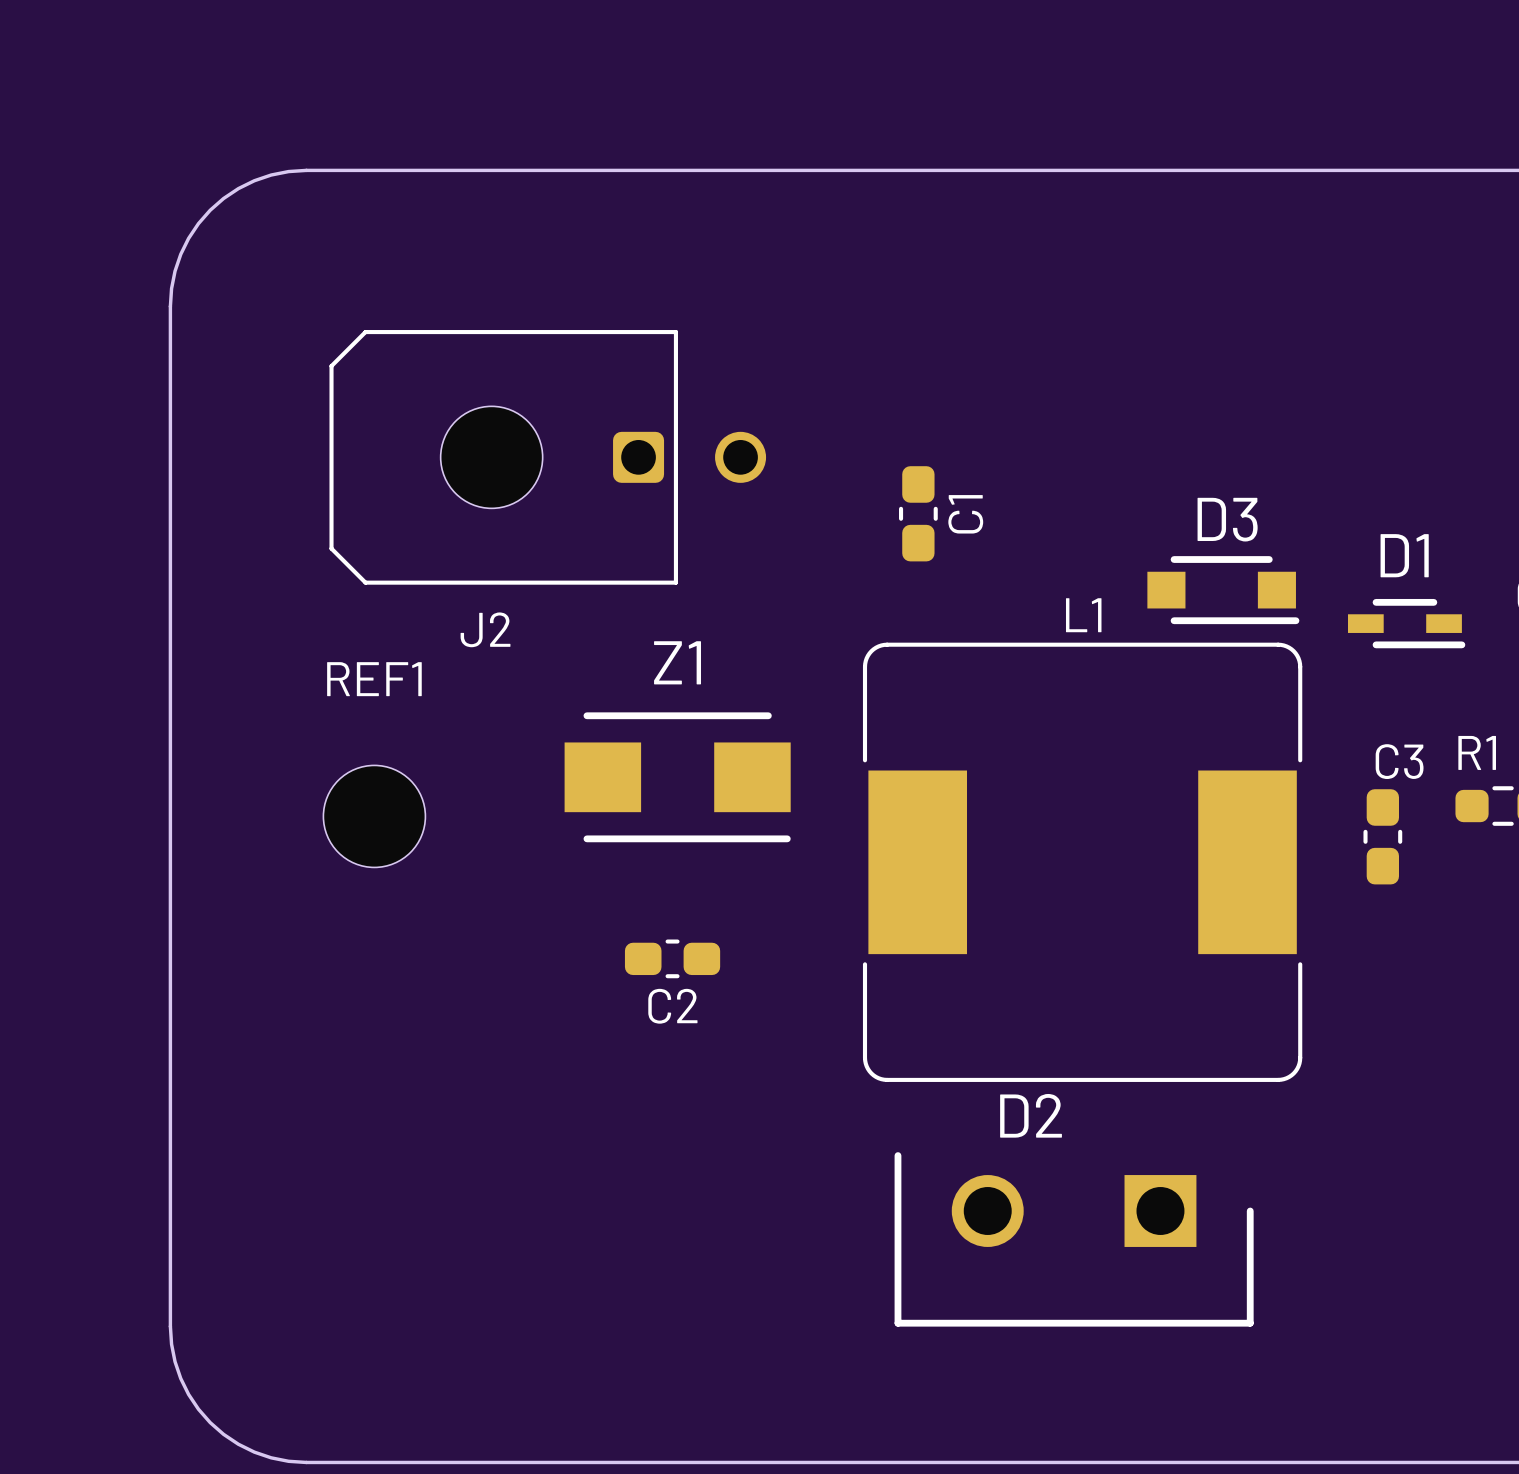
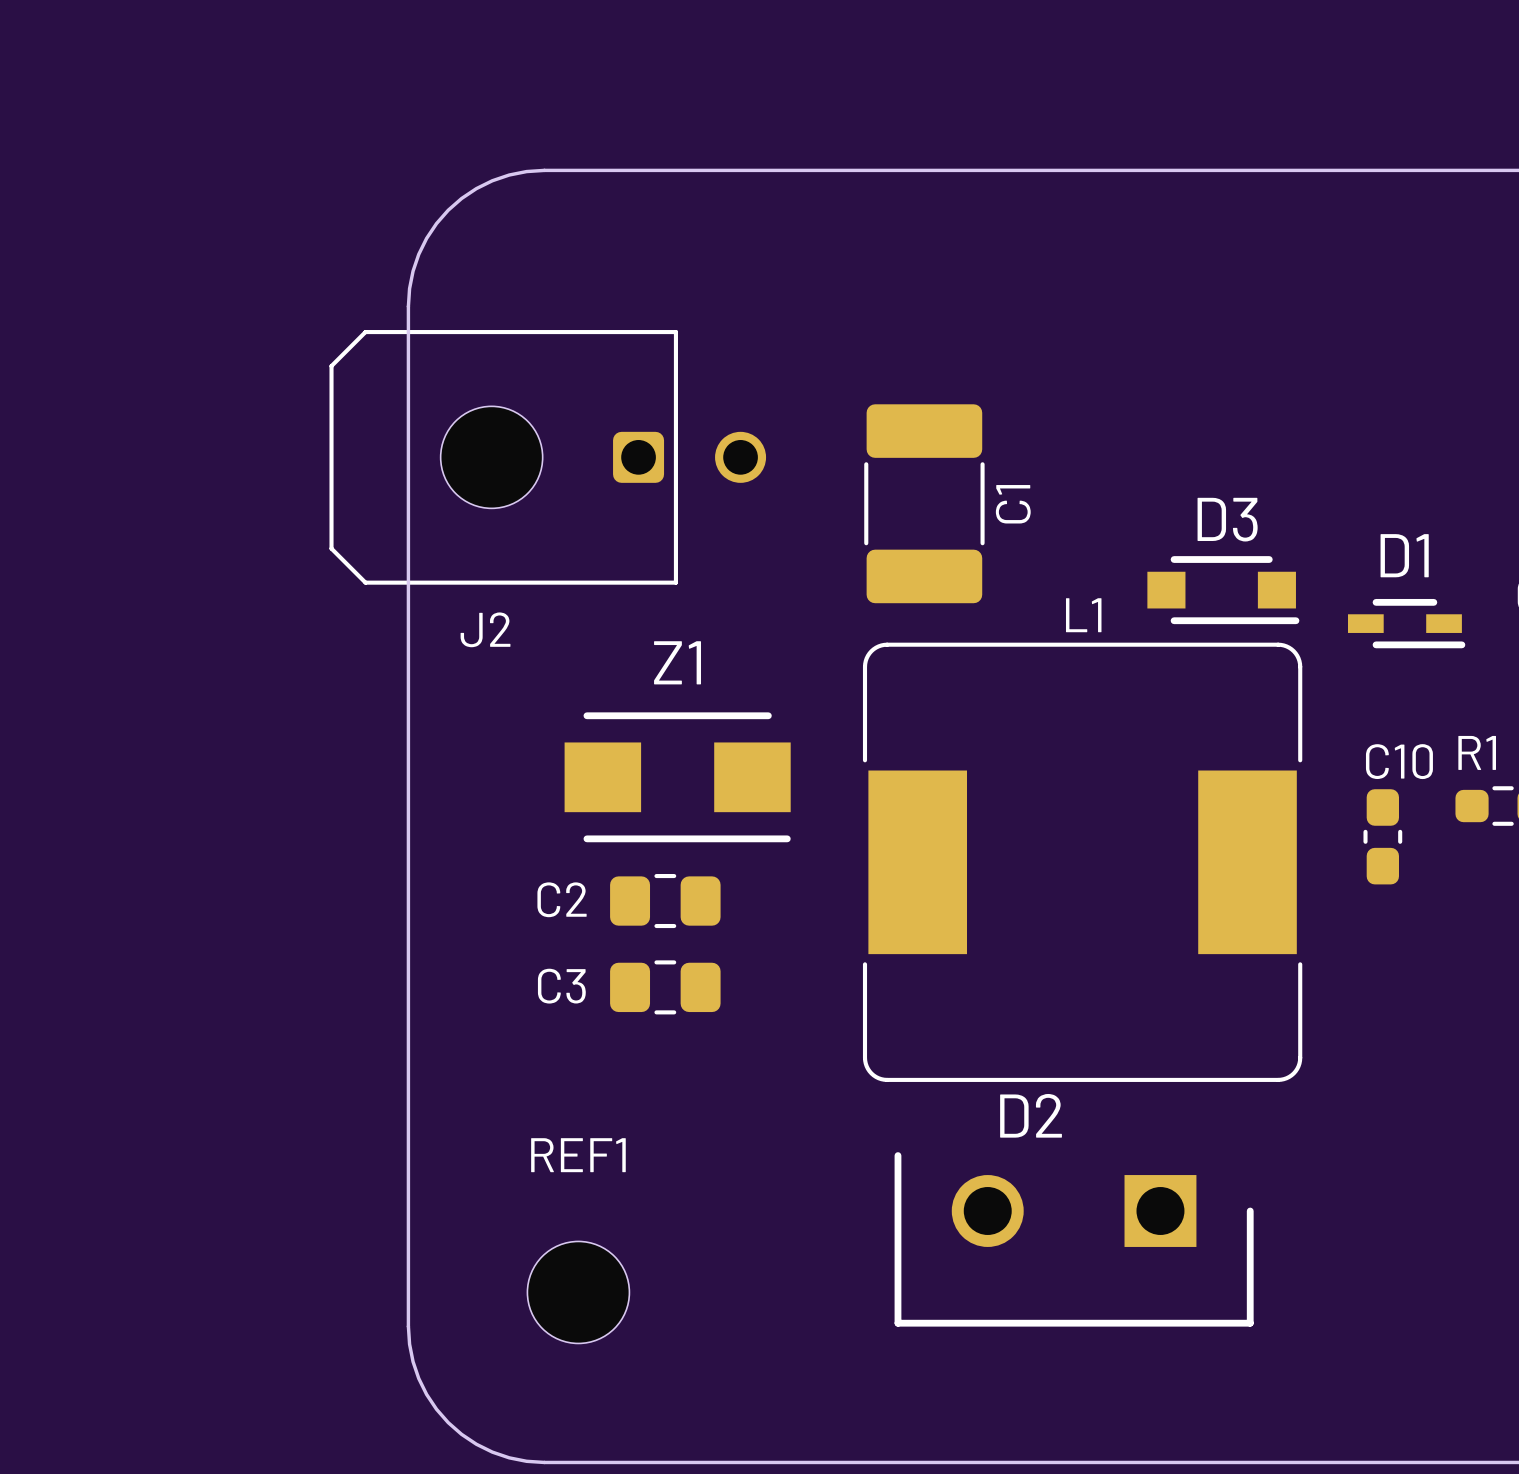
board edge: (544, 170) (306, 170) (271, 175) (254, 180) (223, 198) (198, 223) (180, 254) (175, 271) (170, 306) (170, 1326) (175, 1361) (188, 1394) (210, 1422) (238, 1444) (271, 1457) (306, 1462) (544, 1462) -> (544, 170) (526, 171) (492, 180) (461, 198) (448, 210) (436, 223) (418, 254) (413, 271) (408, 306) (409, 1344) (413, 1361) (426, 1394) (436, 1409) (461, 1434) (492, 1452) (509, 1457) (544, 1462)
C1 footprint: [899, 466, 938, 562] -> [864, 404, 985, 604]
C3 name: C3 (1399, 761) -> C10 (1399, 761)
REF1 position: (374, 816) -> (578, 1292)
C2 footprint: [624, 939, 721, 979] -> [610, 873, 721, 929]
C3: none -> (665, 987)
C2 name position: C2 (672, 1006) -> C2 (562, 899)

